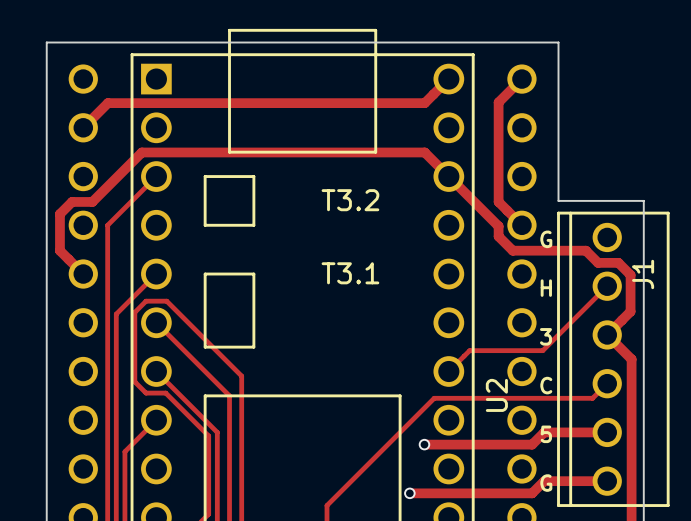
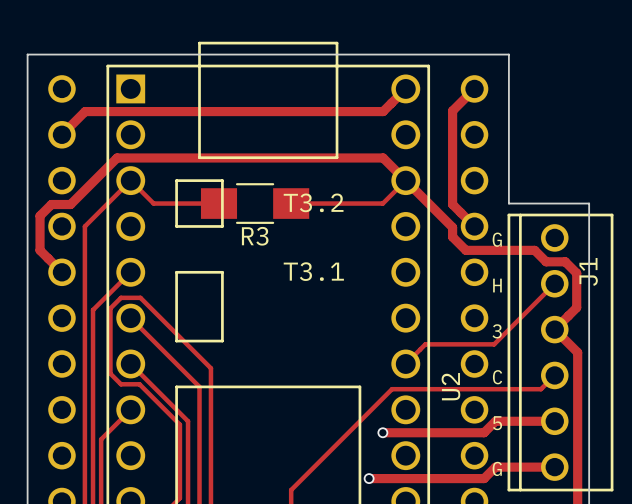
track: none -> (130, 180) (153, 203) (218, 203)
track: none -> (405, 180) (382, 203) (291, 203)
R3: none -> (255, 203)

